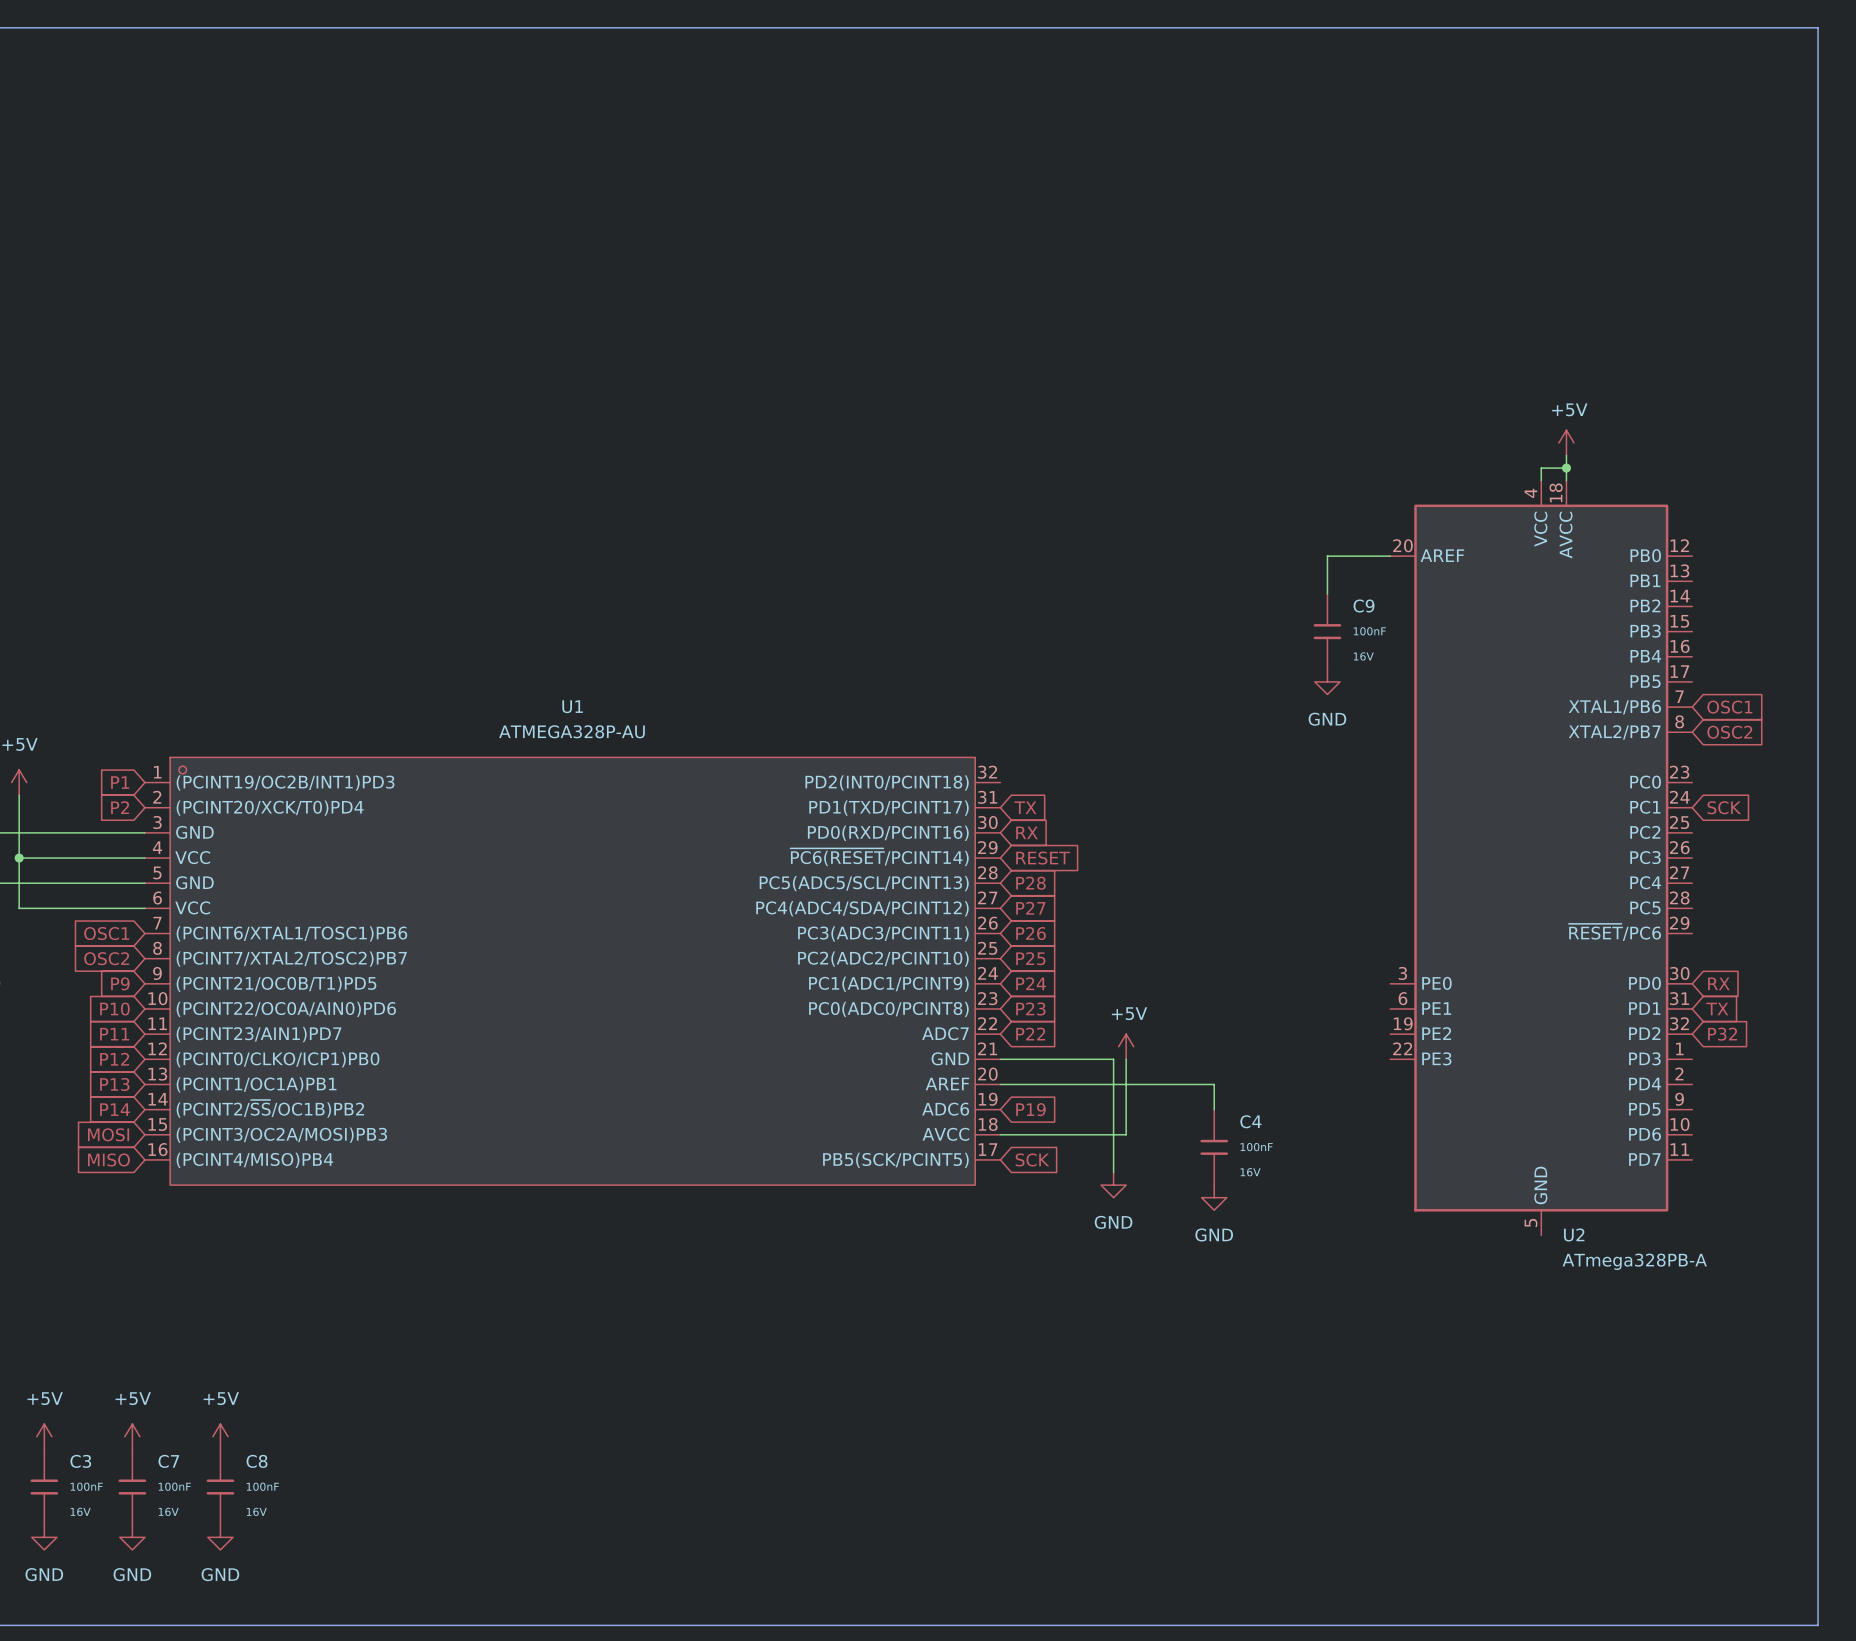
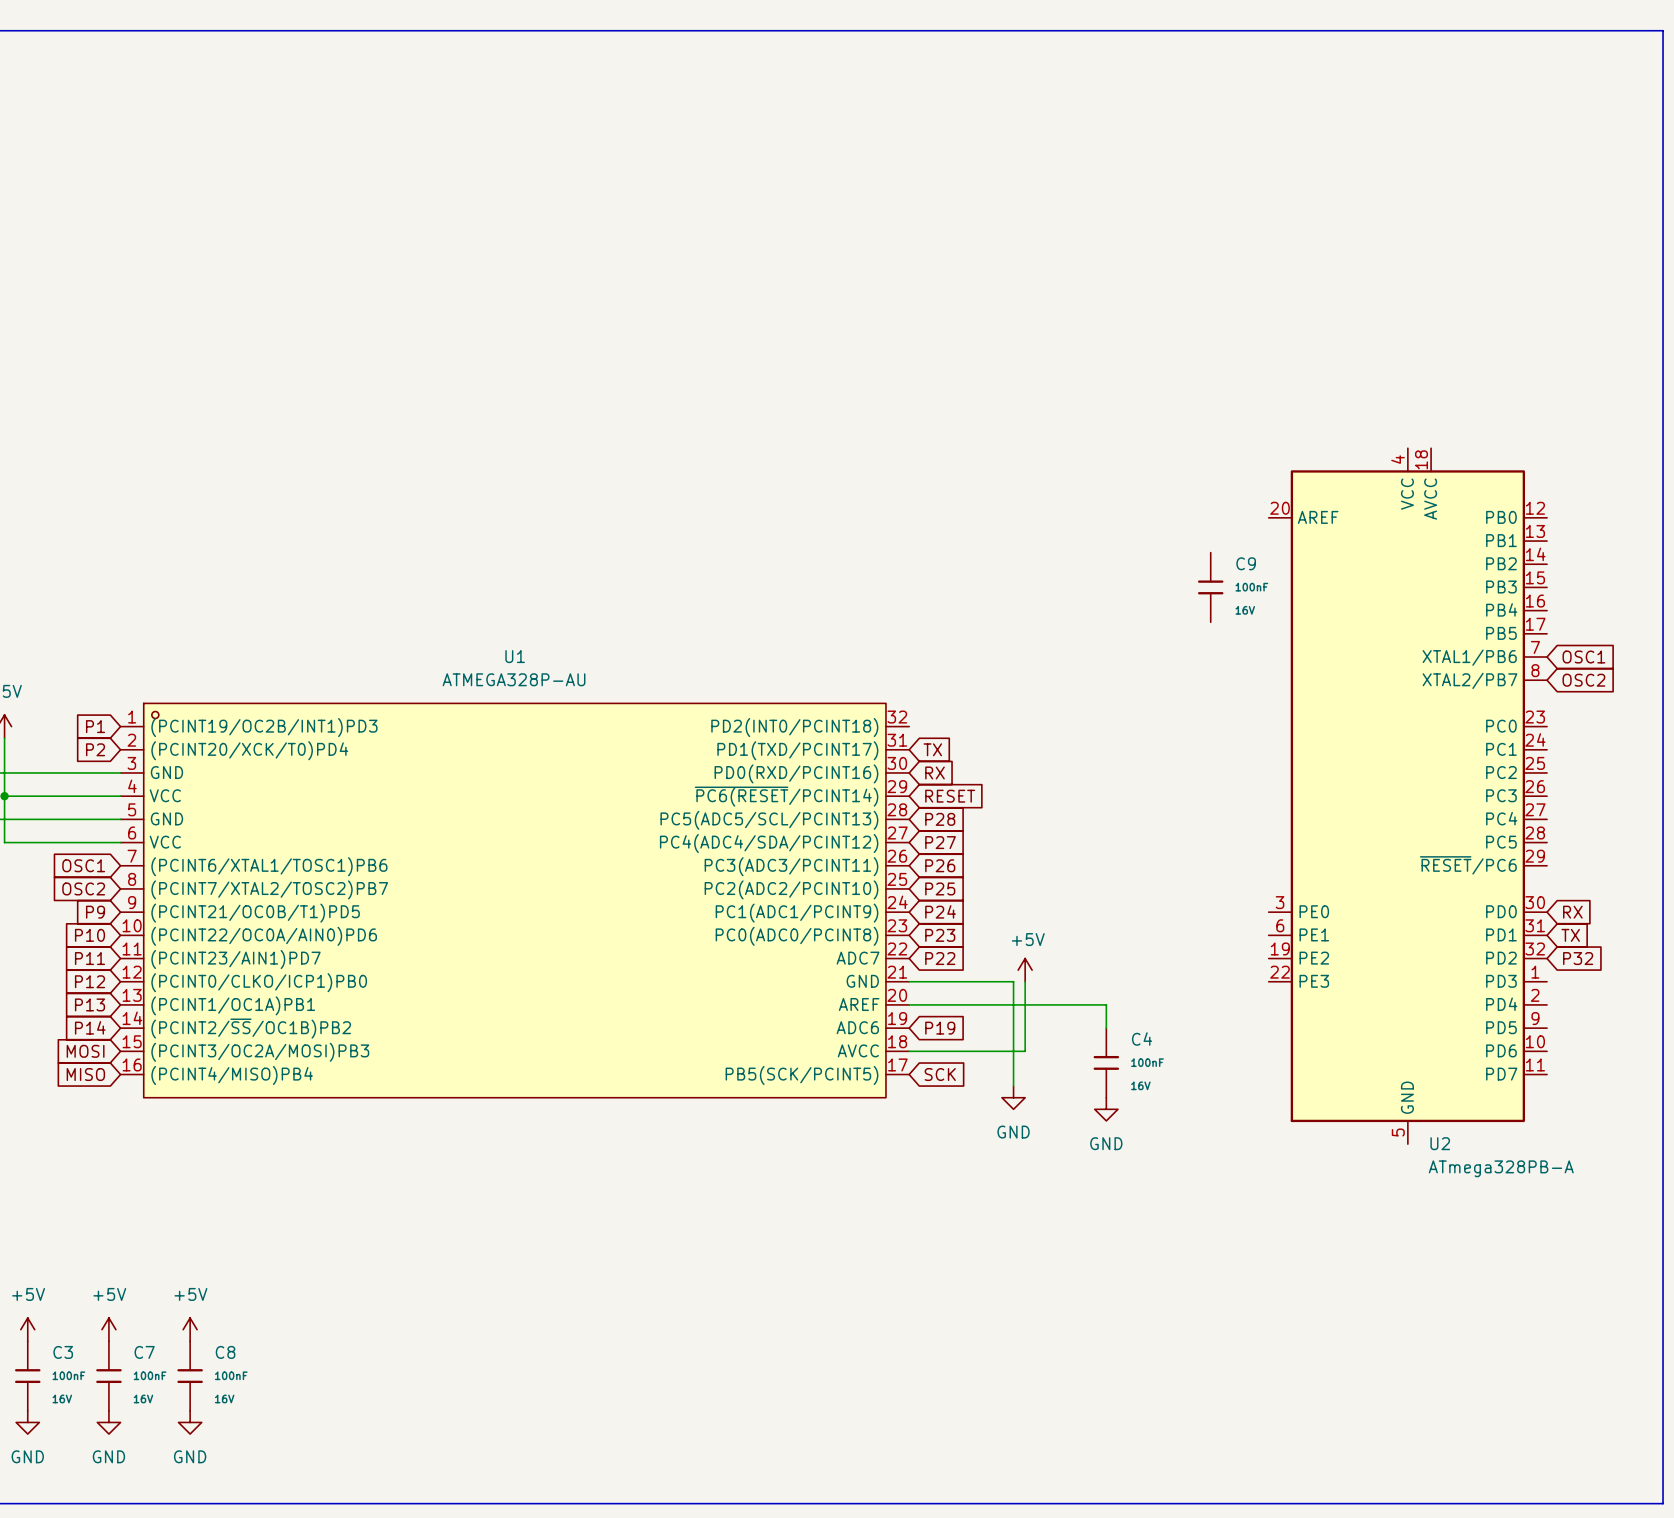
power symbol: +5V (1566, 442) -> none
wire: (1566, 455) (1566, 480) -> none
wire: (1566, 468) (1541, 468) (1541, 480) -> none
junction: (1566, 468) -> none
wire: (1390, 556) (1327, 556) (1327, 593) -> none
power symbol: GND (1327, 681) -> none
global label: SCK (1724, 807) -> none

